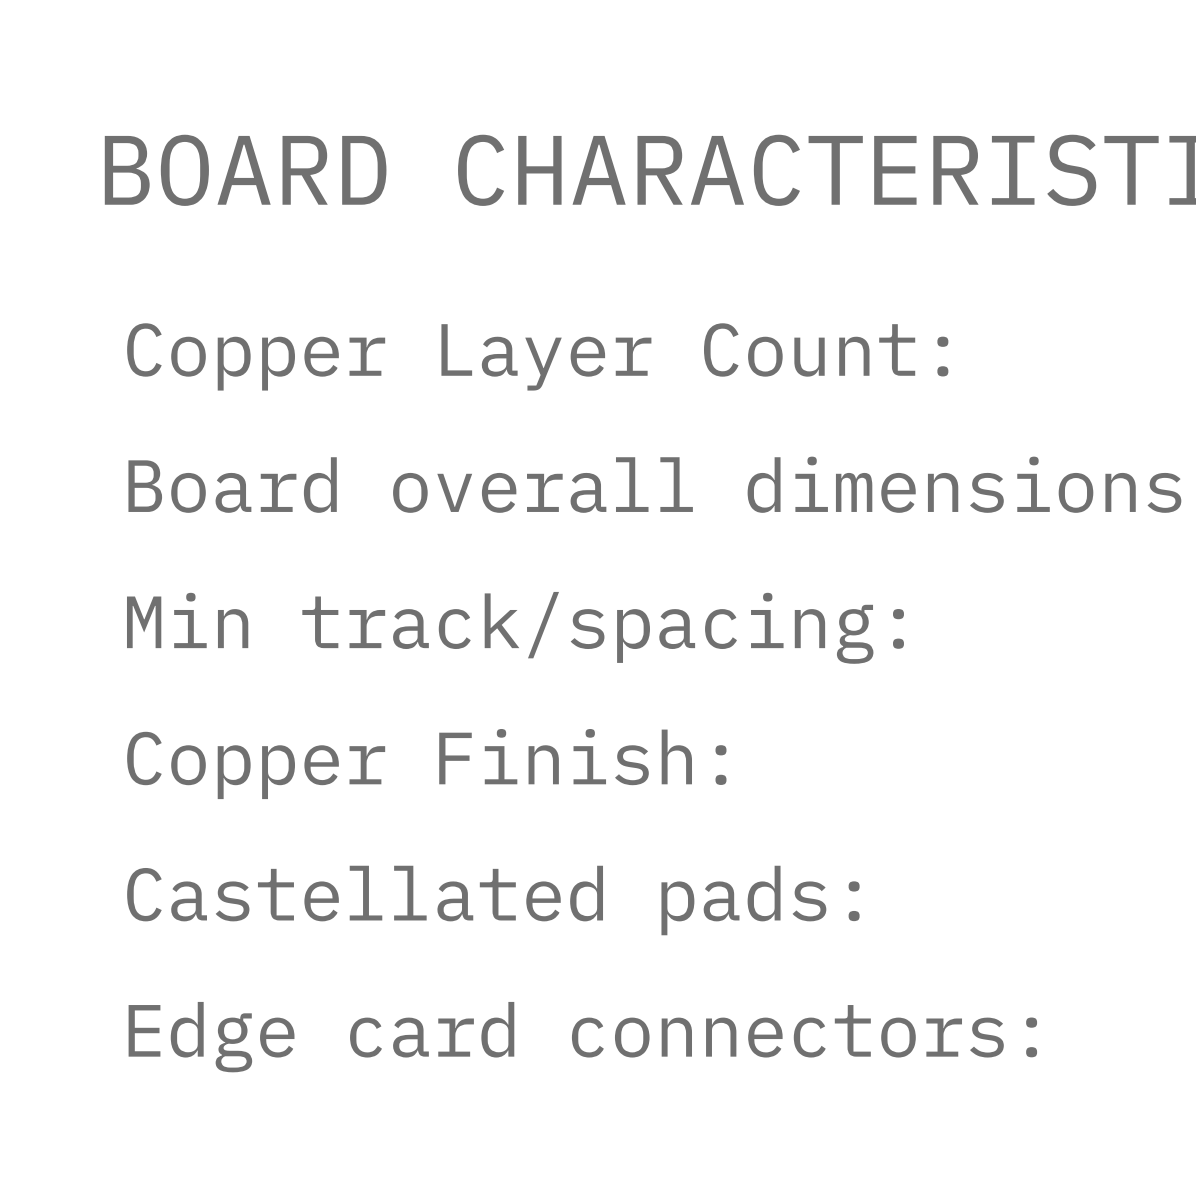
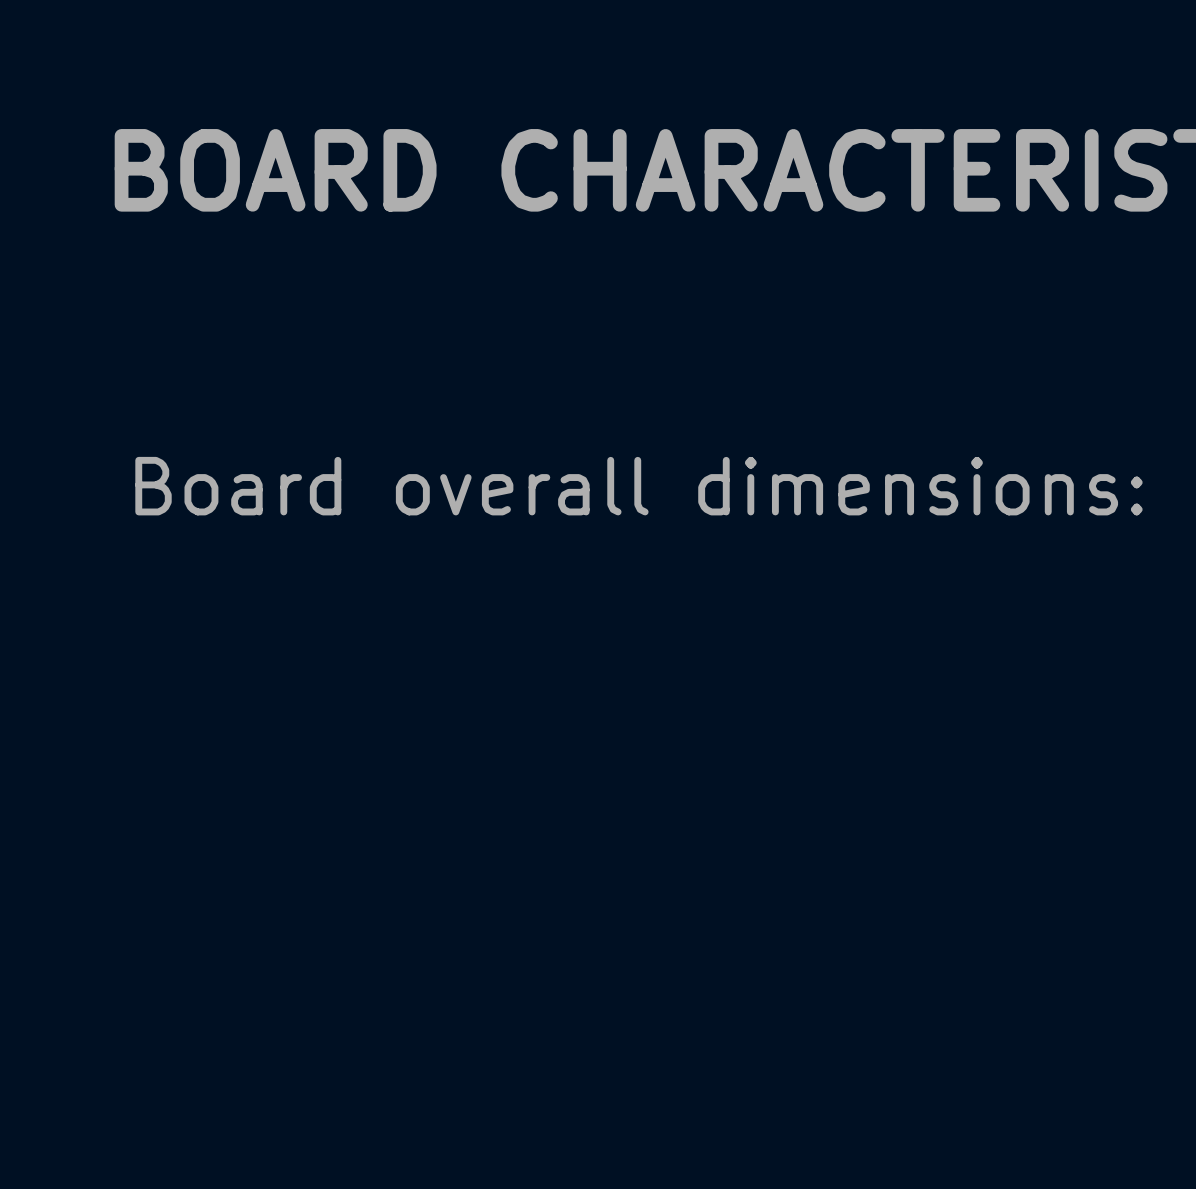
text: Copper Layer Count: (537, 356) -> none
text: Min track/spacing: (515, 627) -> none
text: Copper Finish: (426, 764) -> none
text: Castellated pads: (493, 900) -> none
text: Edge card connectors: (582, 1037) -> none

